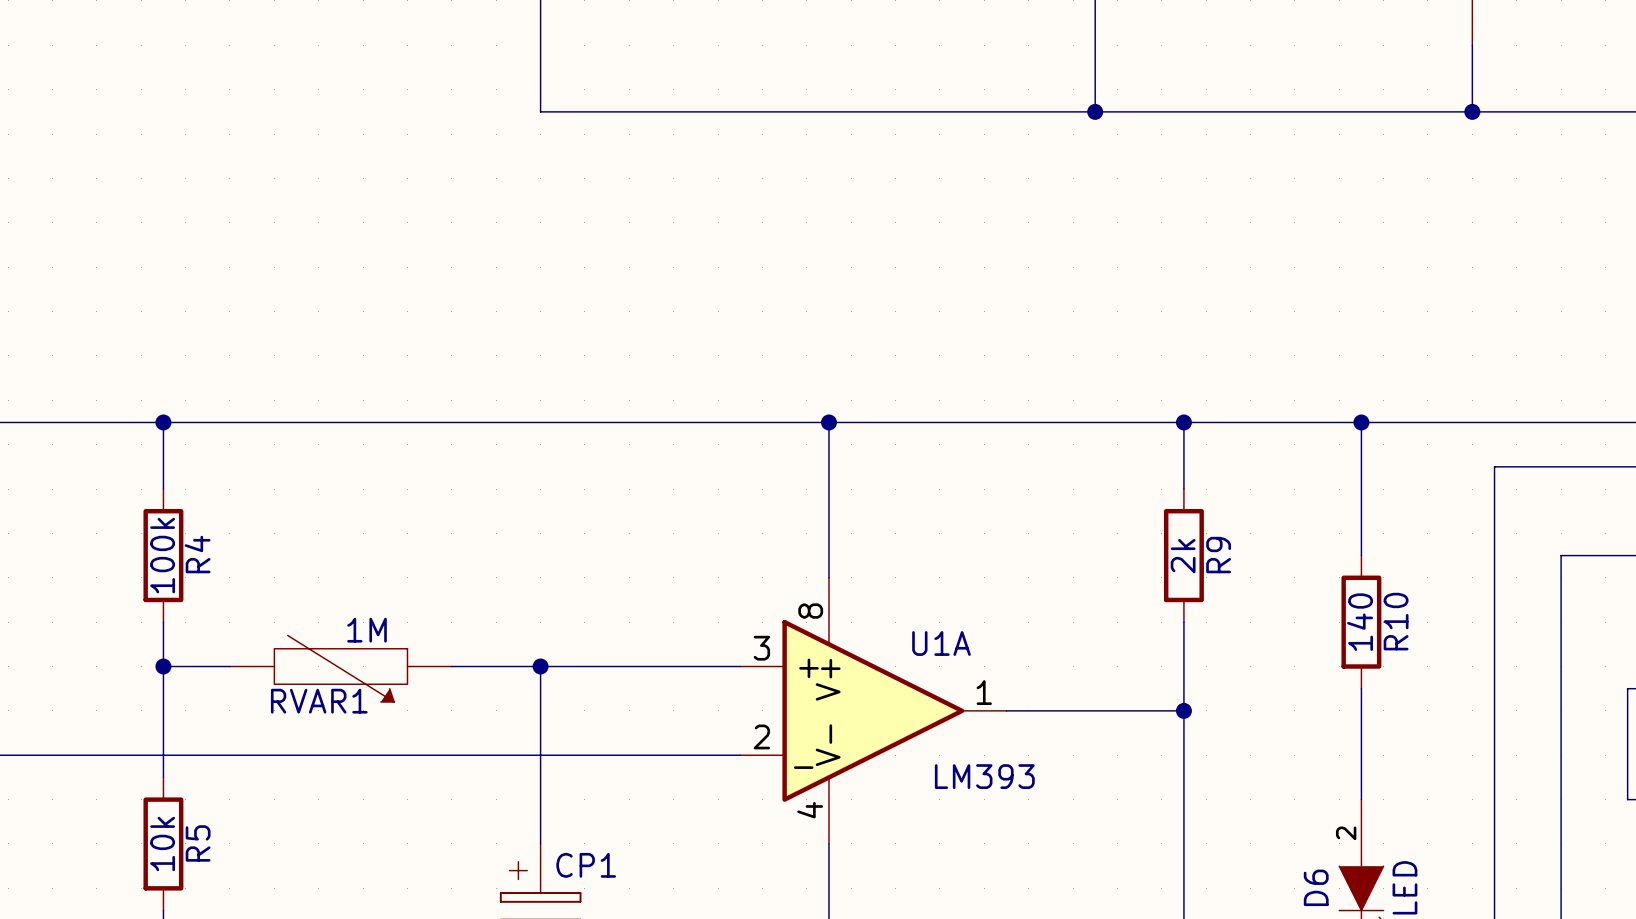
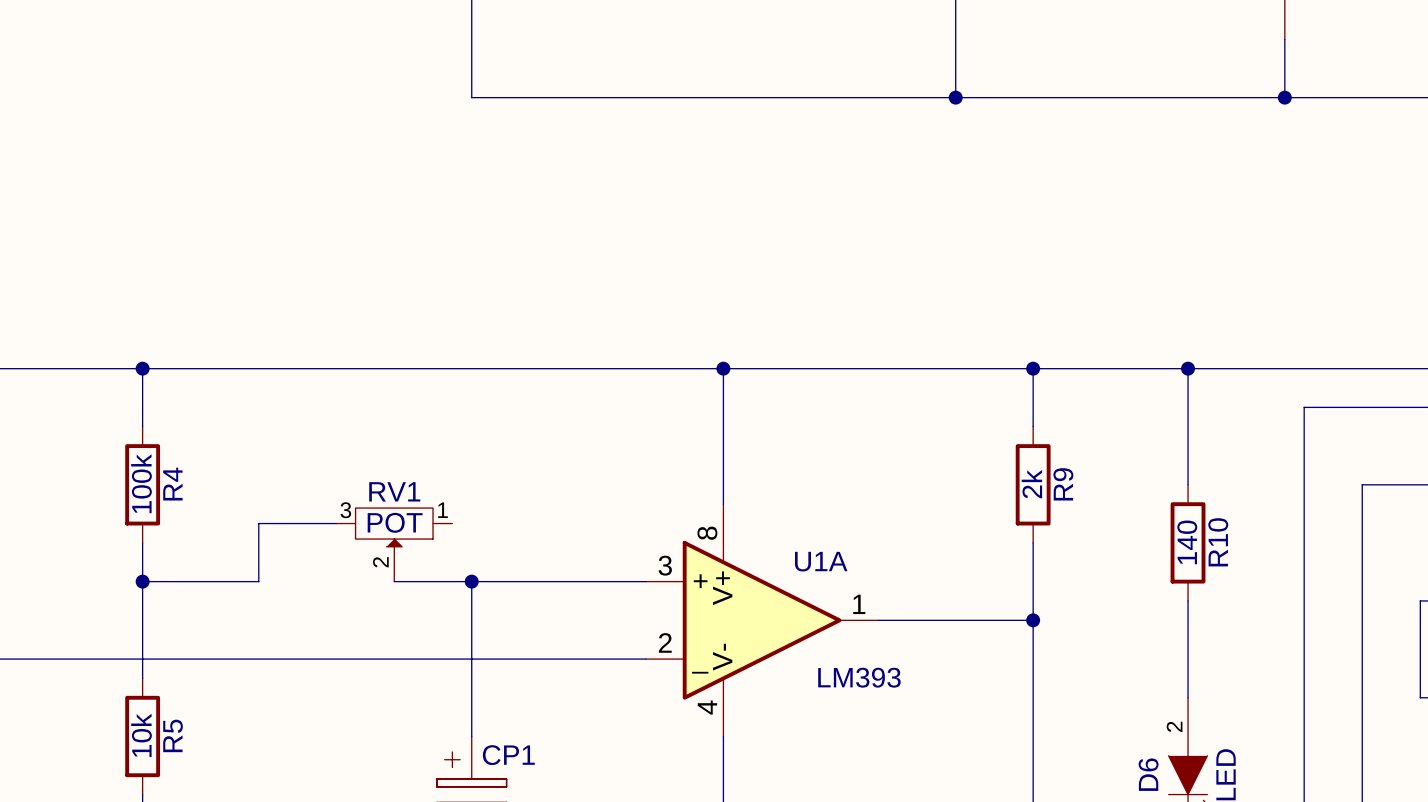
wire: none -> (336, 523) (258, 523) (258, 581) (200, 581)
RV1: none -> POT (394, 544)
RVAR1: 1M (340, 668) -> none

